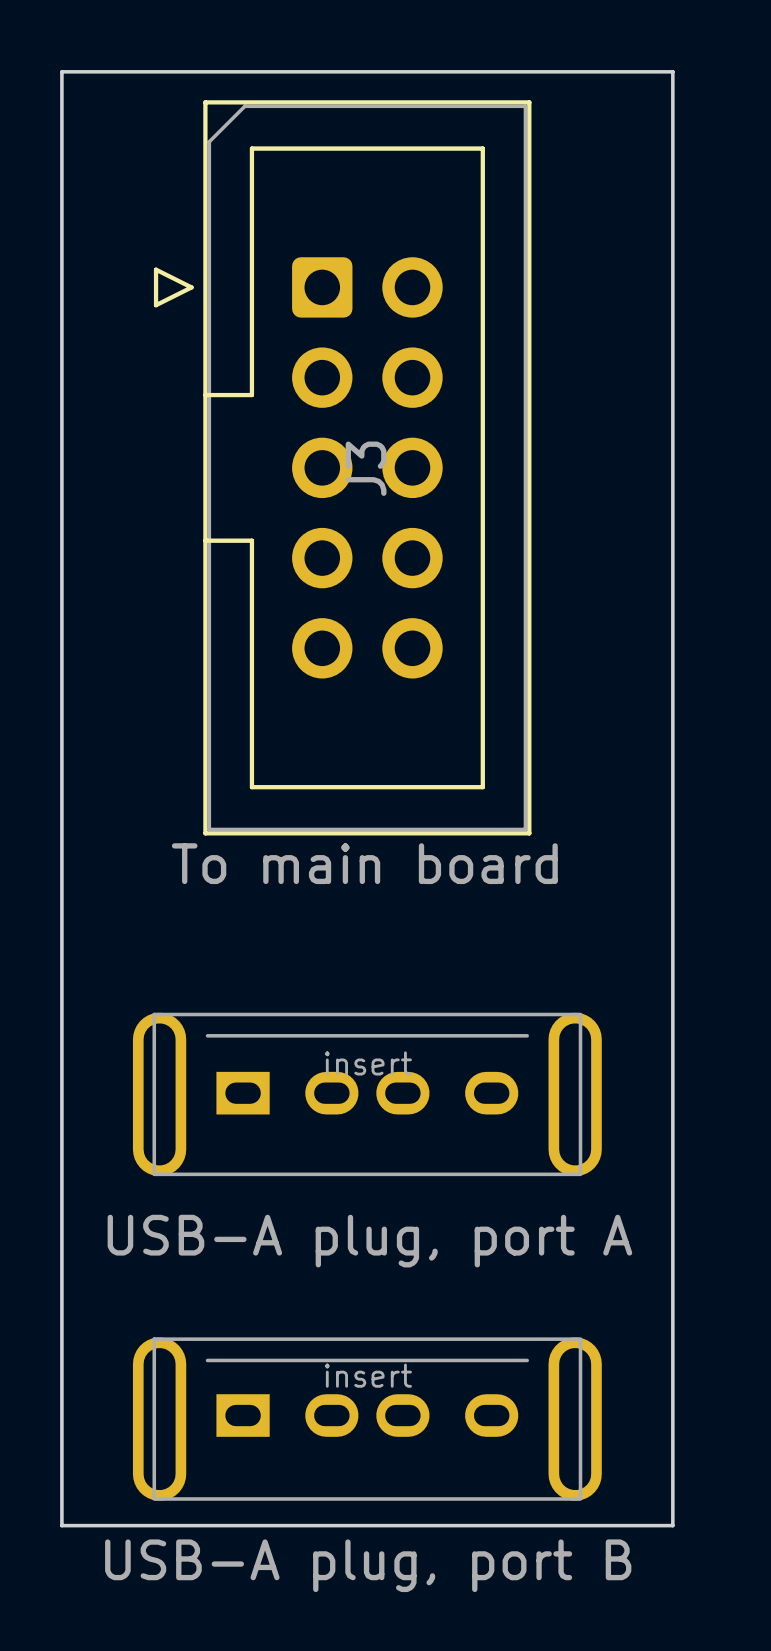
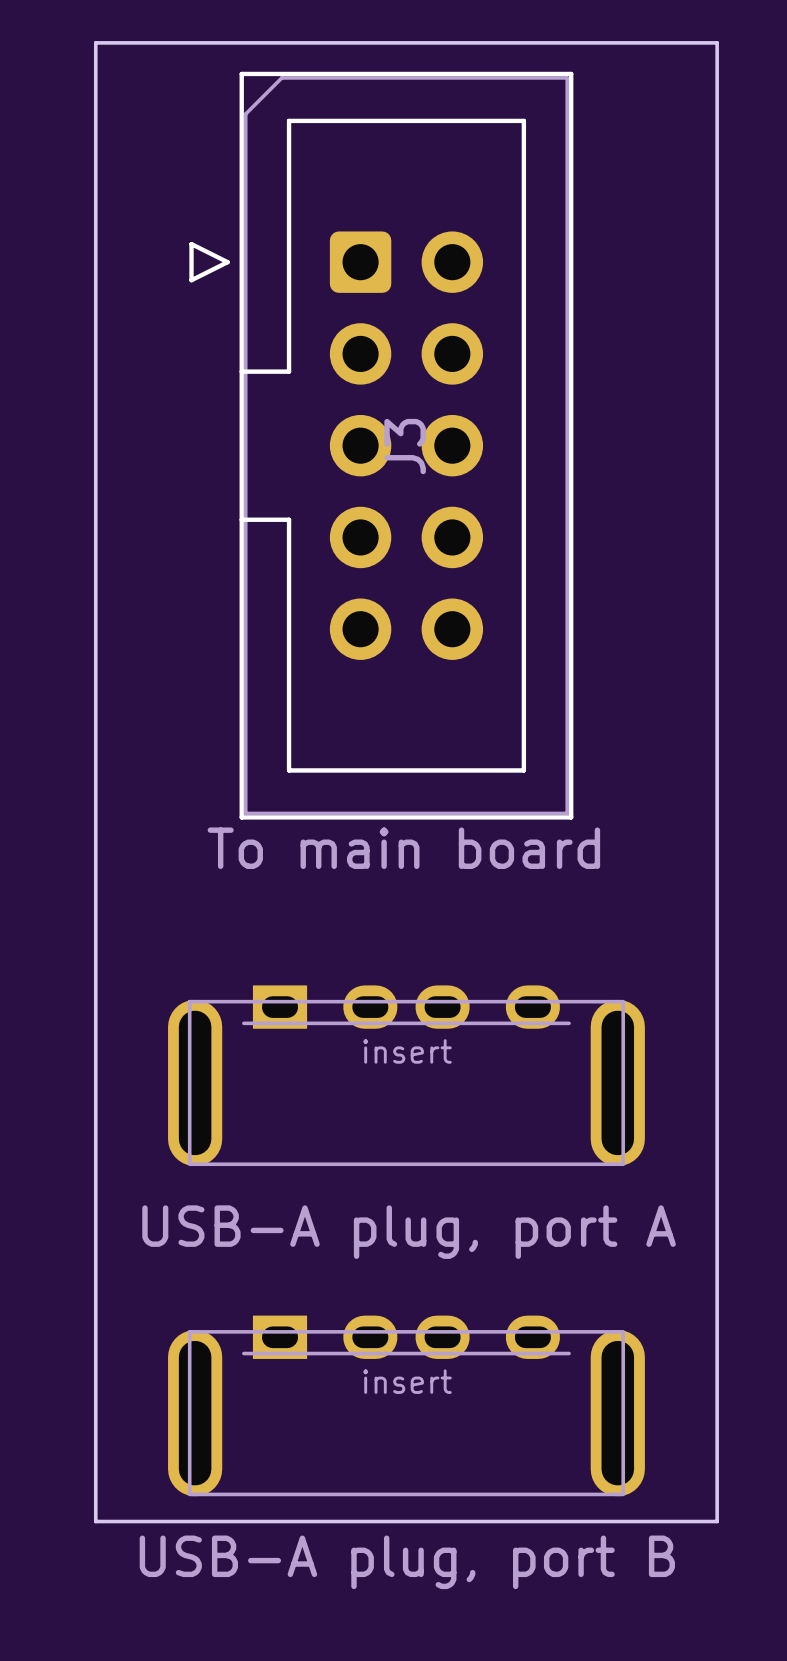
part footprint: [132, 1012, 602, 1177] -> [168, 985, 645, 1167]
part footprint: [132, 1337, 602, 1501] -> [168, 1315, 645, 1497]

